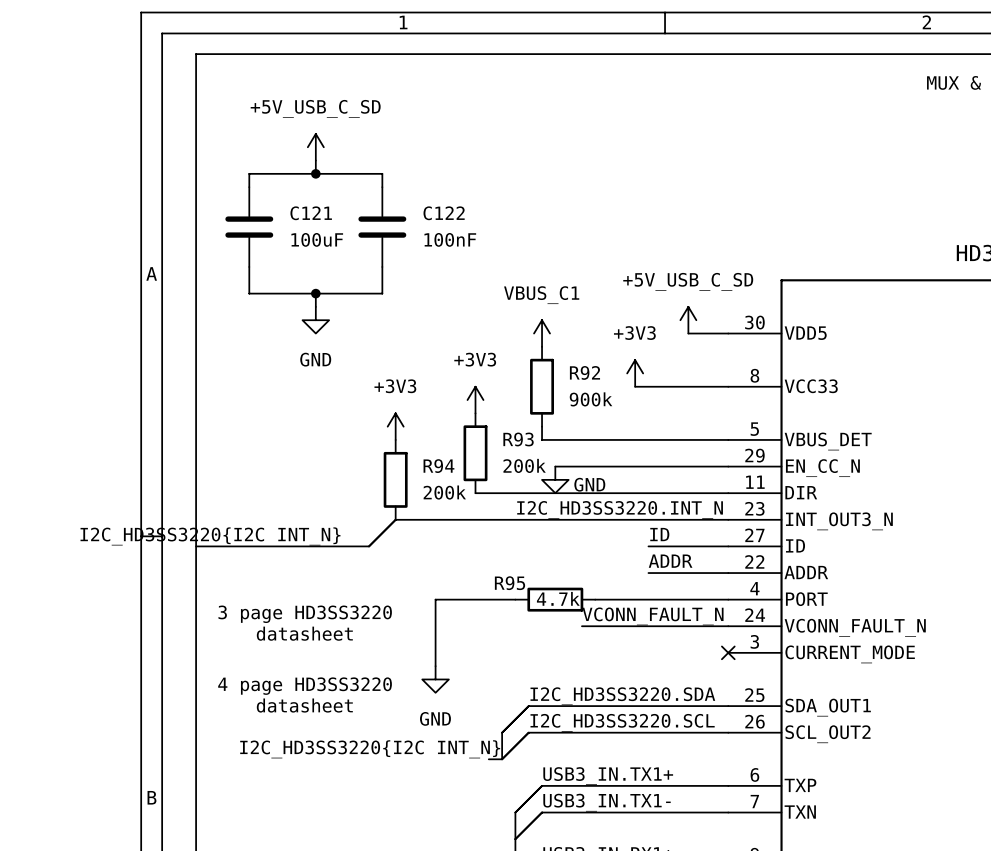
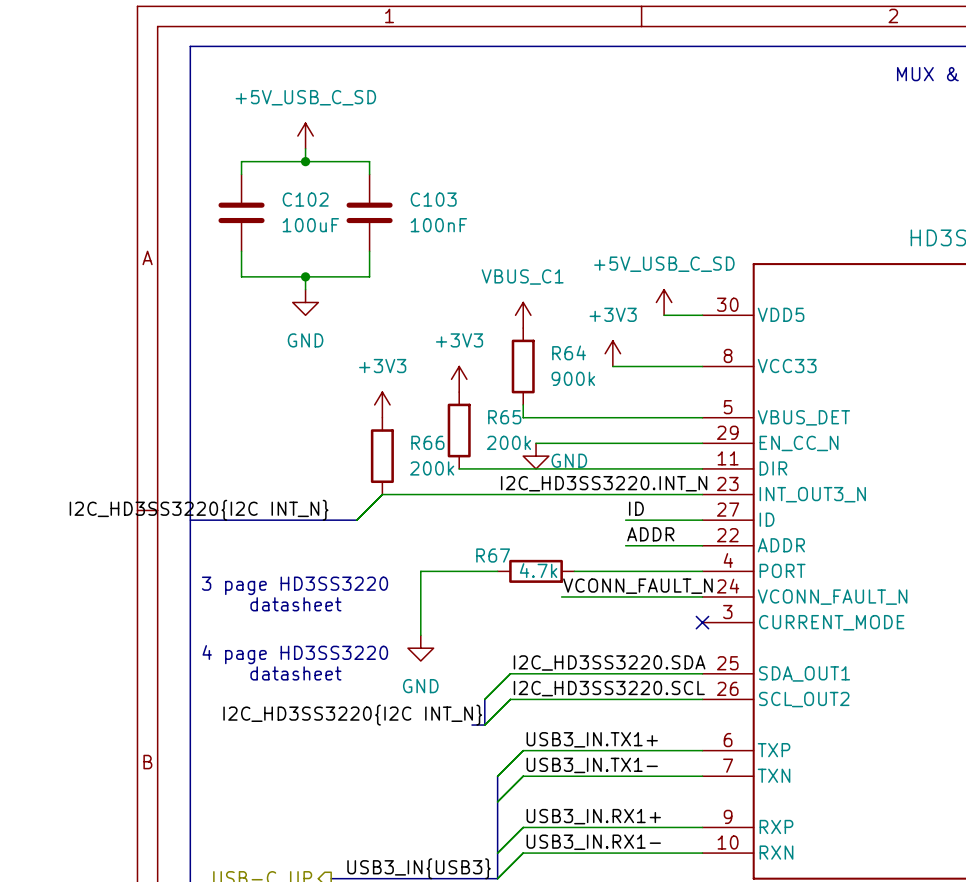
C121 name: C121 (311, 213) -> C102 (305, 199)
C122 name: C122 (444, 213) -> C103 (433, 199)
R92 name: R92 (584, 372) -> R64 (569, 352)
R93 name: R93 (518, 439) -> R65 (504, 417)
R94 name: R94 (438, 466) -> R66 (427, 442)
R95 name: R95 (510, 583) -> R67 (493, 555)

